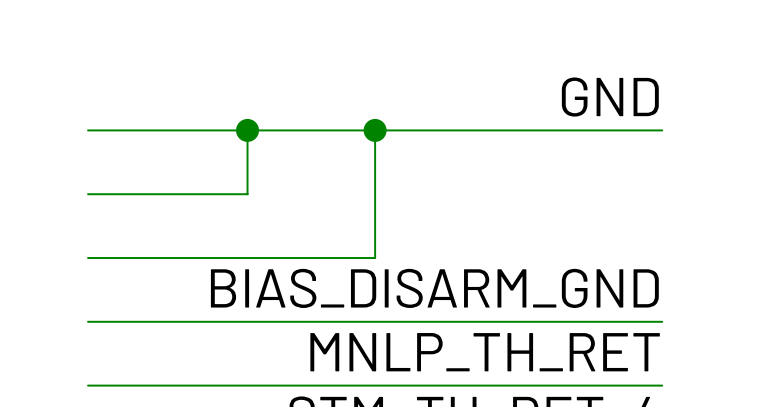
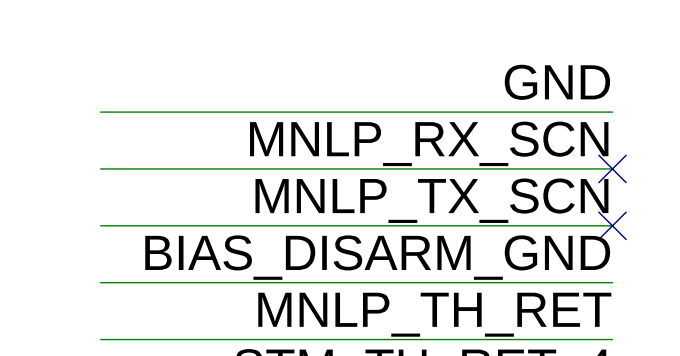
wire: (247, 130) (247, 194) -> (612, 168) (242, 168)
junction: (247, 130) -> none
wire: (375, 130) (375, 258) -> (612, 225) (356, 225)
junction: (375, 130) -> none
label: none -> MNLP_RX_SCN (429, 143)
no-connect mark: none -> (612, 168)
label: none -> MNLP_TX_SCN (431, 200)
no-connect mark: none -> (612, 225)

